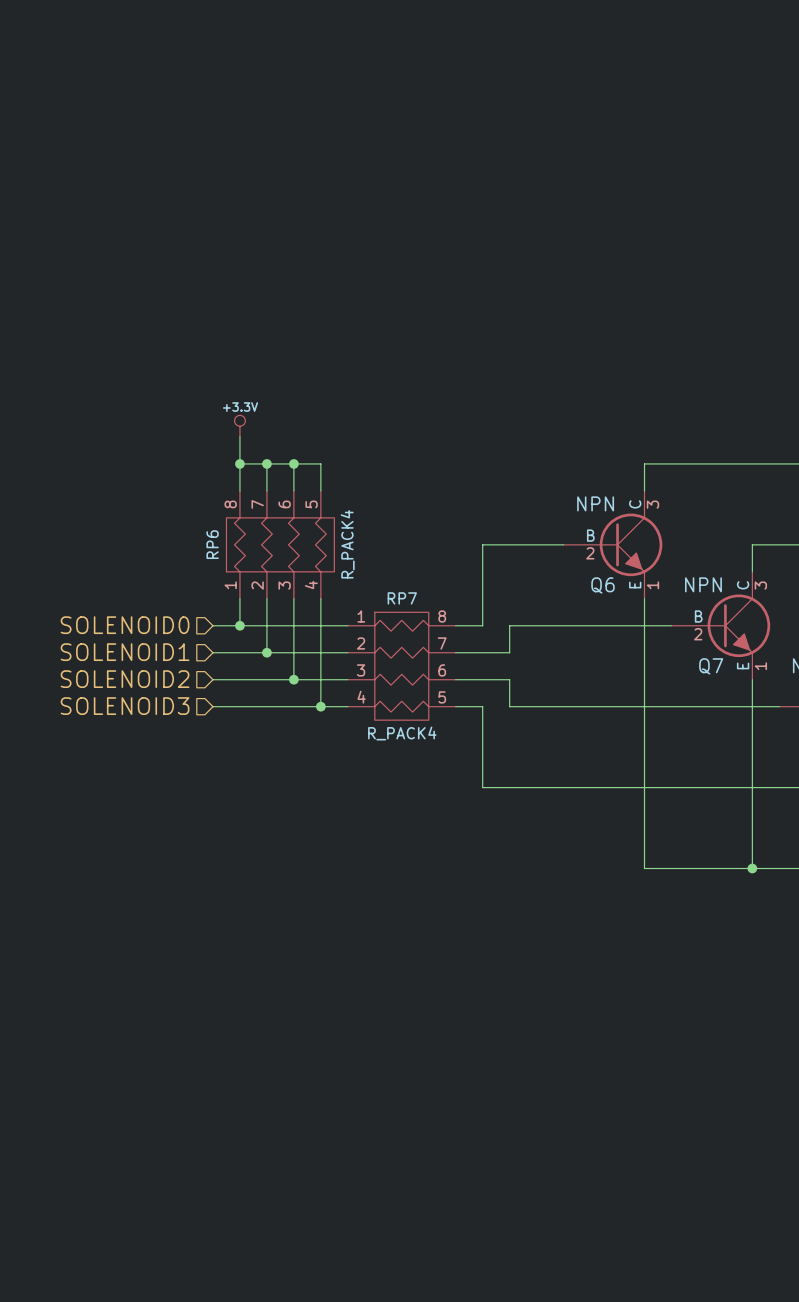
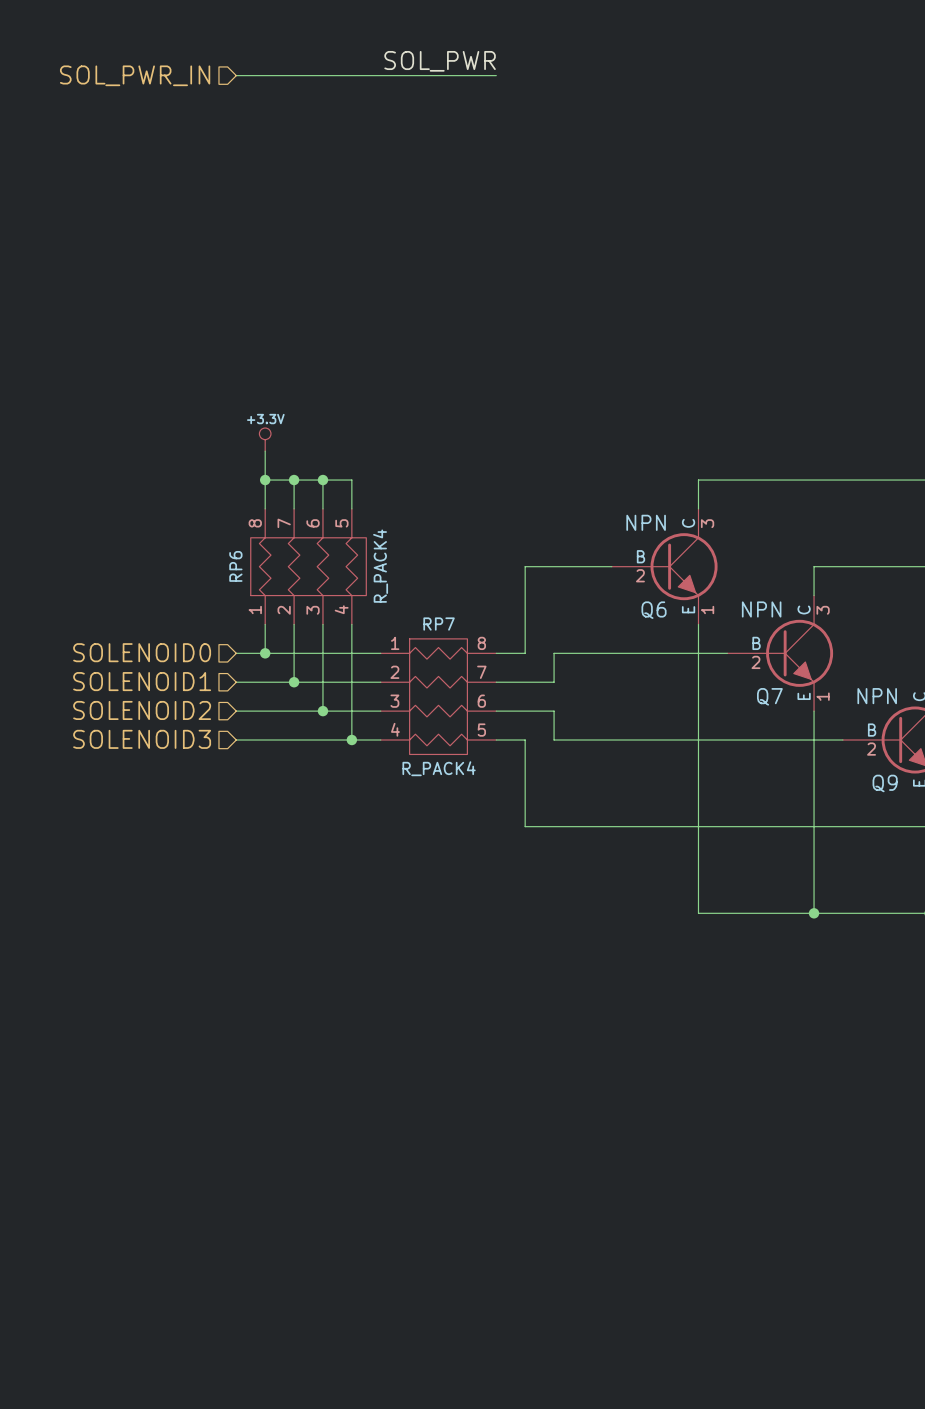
label: none -> SOL_PWR (440, 61)
hierarchical label: none -> SOL_PWR_IN (135, 75)
wire: none -> (236, 75) (496, 75)

